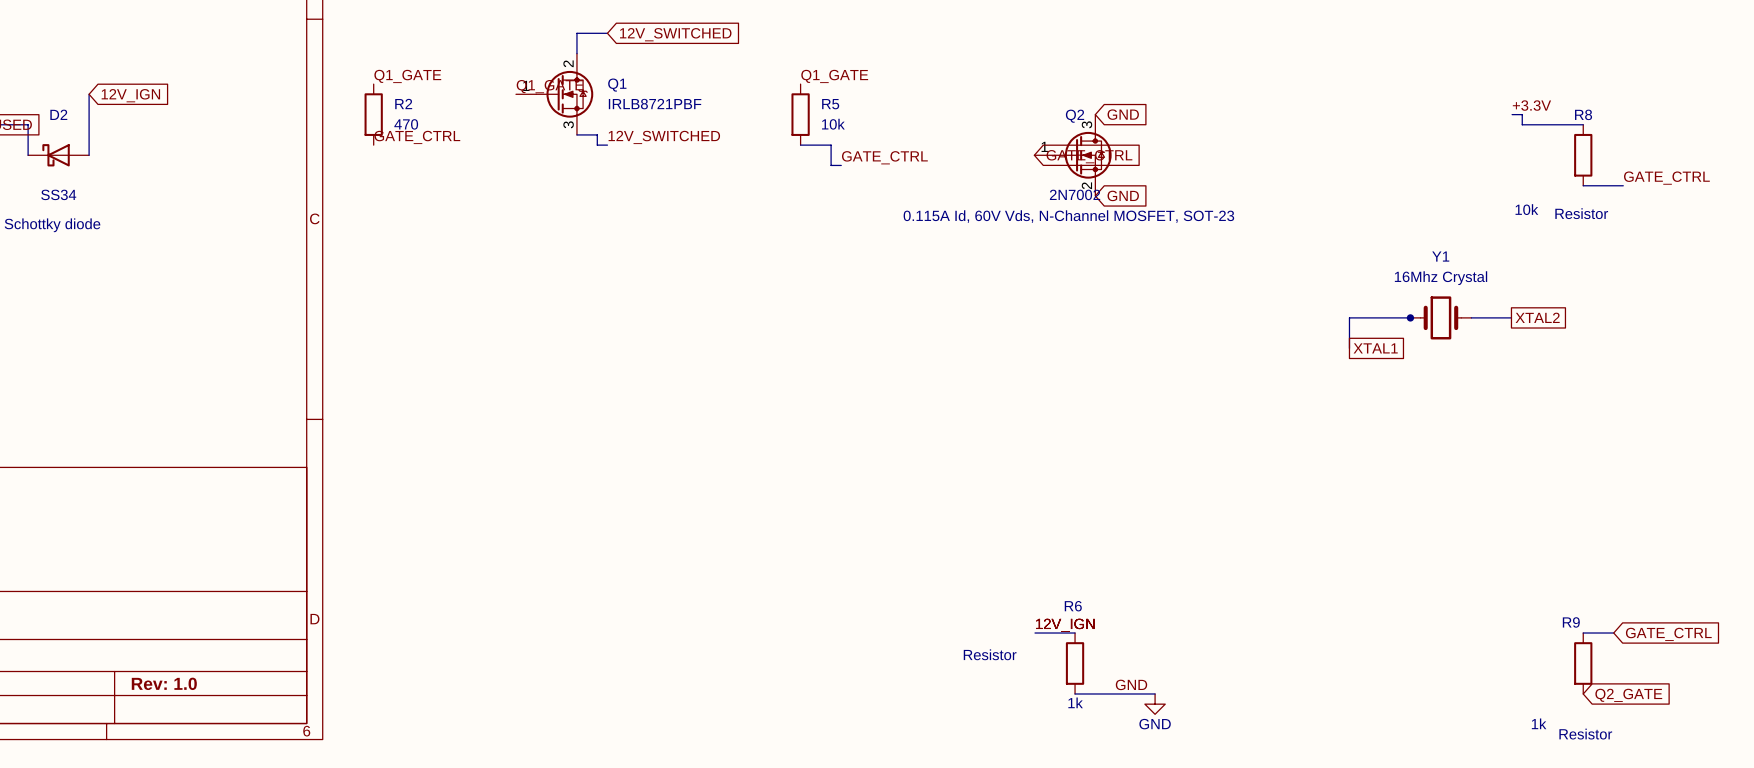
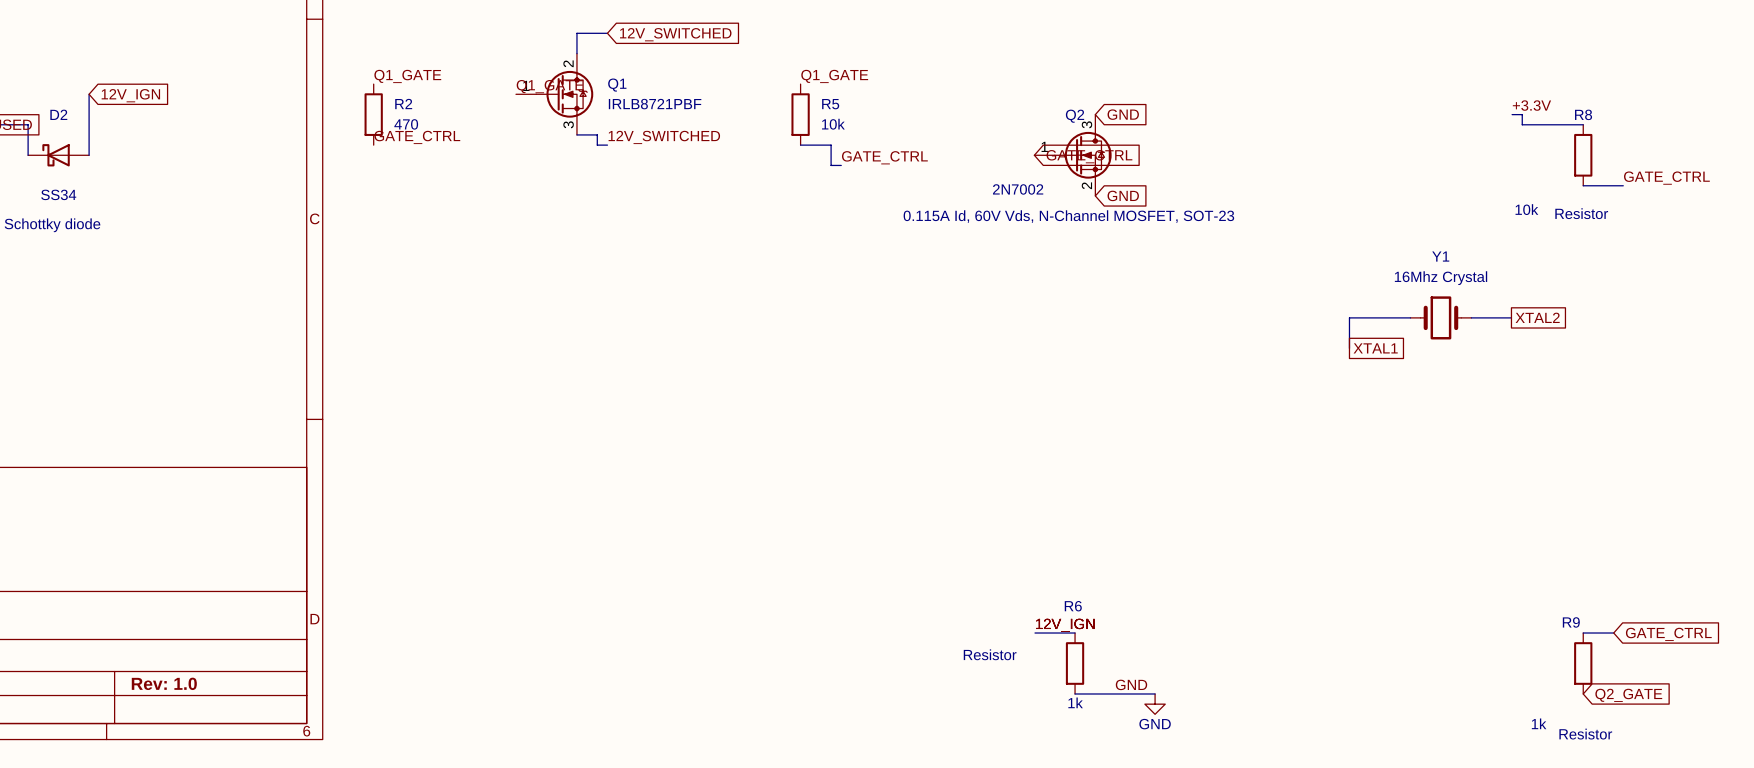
Q2 value position: 2N7002 (1075, 194) -> 2N7002 (1018, 189)
junction: (1410, 317) -> none

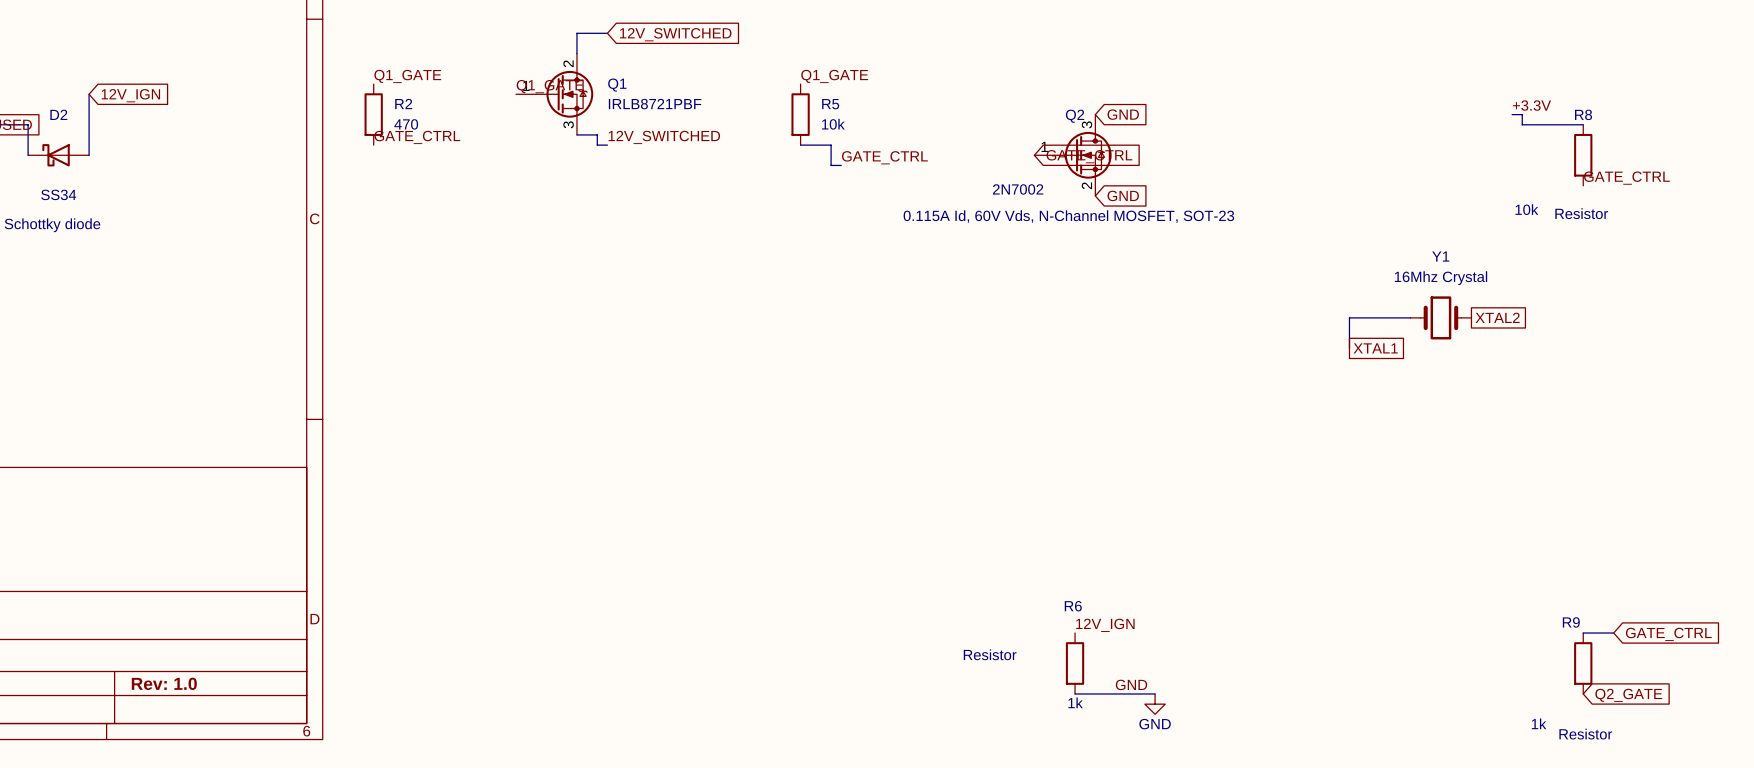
label position: GATE_CTRL (1666, 178) -> GATE_CTRL (1626, 178)
wire: (1583, 185) (1623, 185) -> none
wire: (1471, 317) (1511, 317) -> none
global label position: XTAL2 (1537, 317) -> XTAL2 (1497, 317)
label position: 12V_IGN (1065, 625) -> 12V_IGN (1105, 625)
wire: (1035, 633) (1075, 633) -> none

